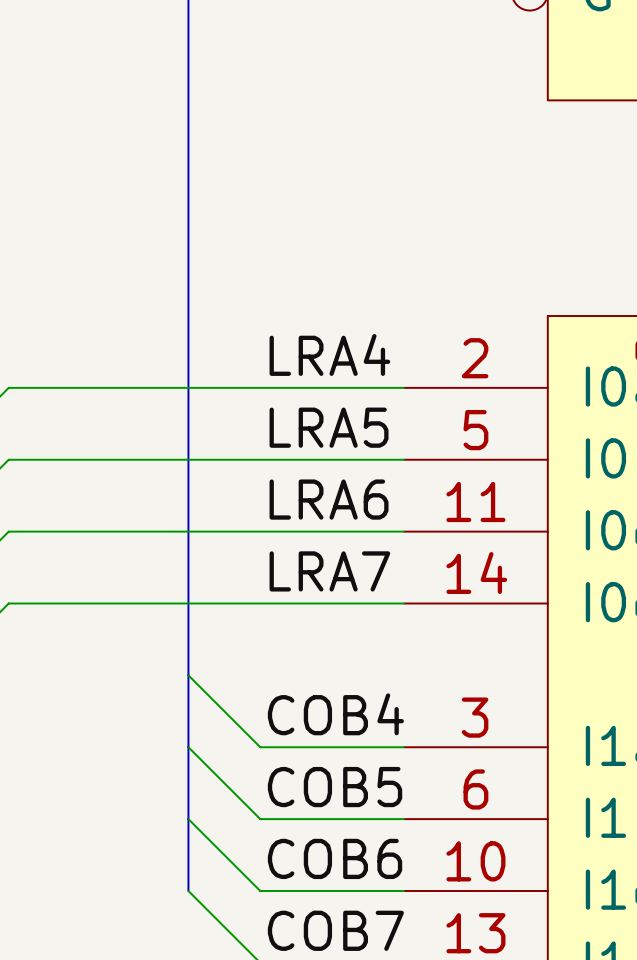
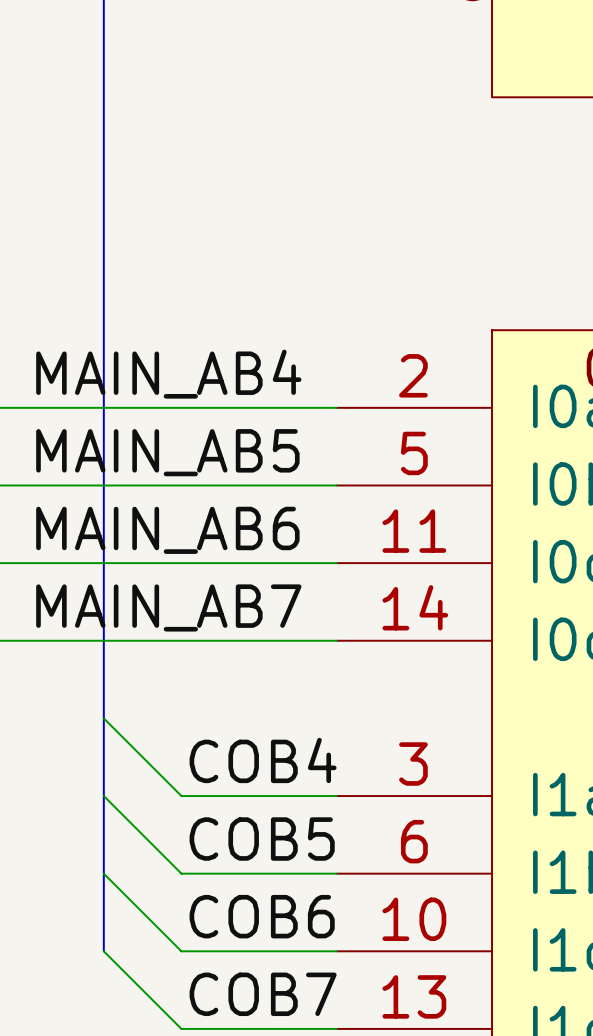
label: LRA4 (329, 354) -> none
label: none -> MAIN_AB4 (168, 374)
label: LRA5 (329, 427) -> none
label: none -> MAIN_AB5 (167, 452)
label: LRA6 (329, 499) -> none
label: none -> MAIN_AB6 (167, 530)
label: LRA7 (329, 571) -> none
label: none -> MAIN_AB7 (168, 607)

